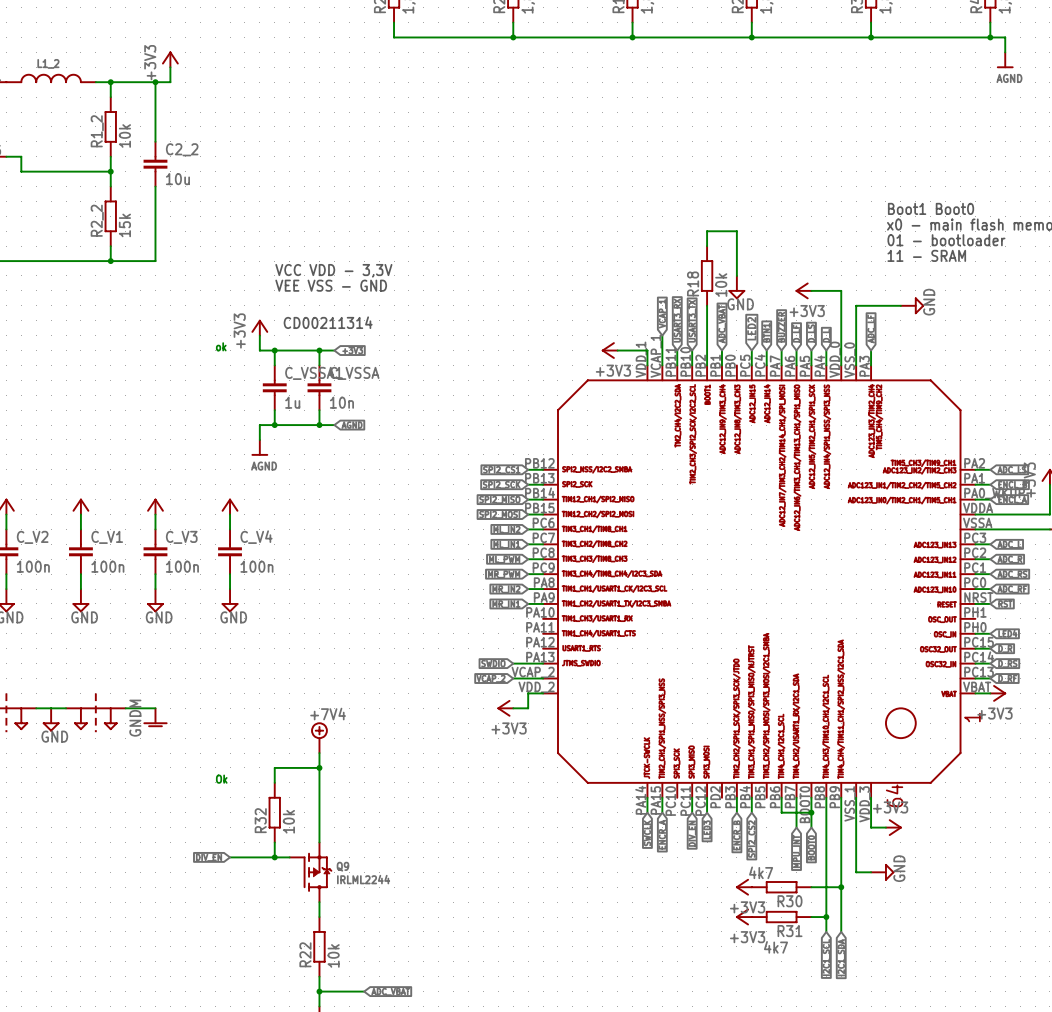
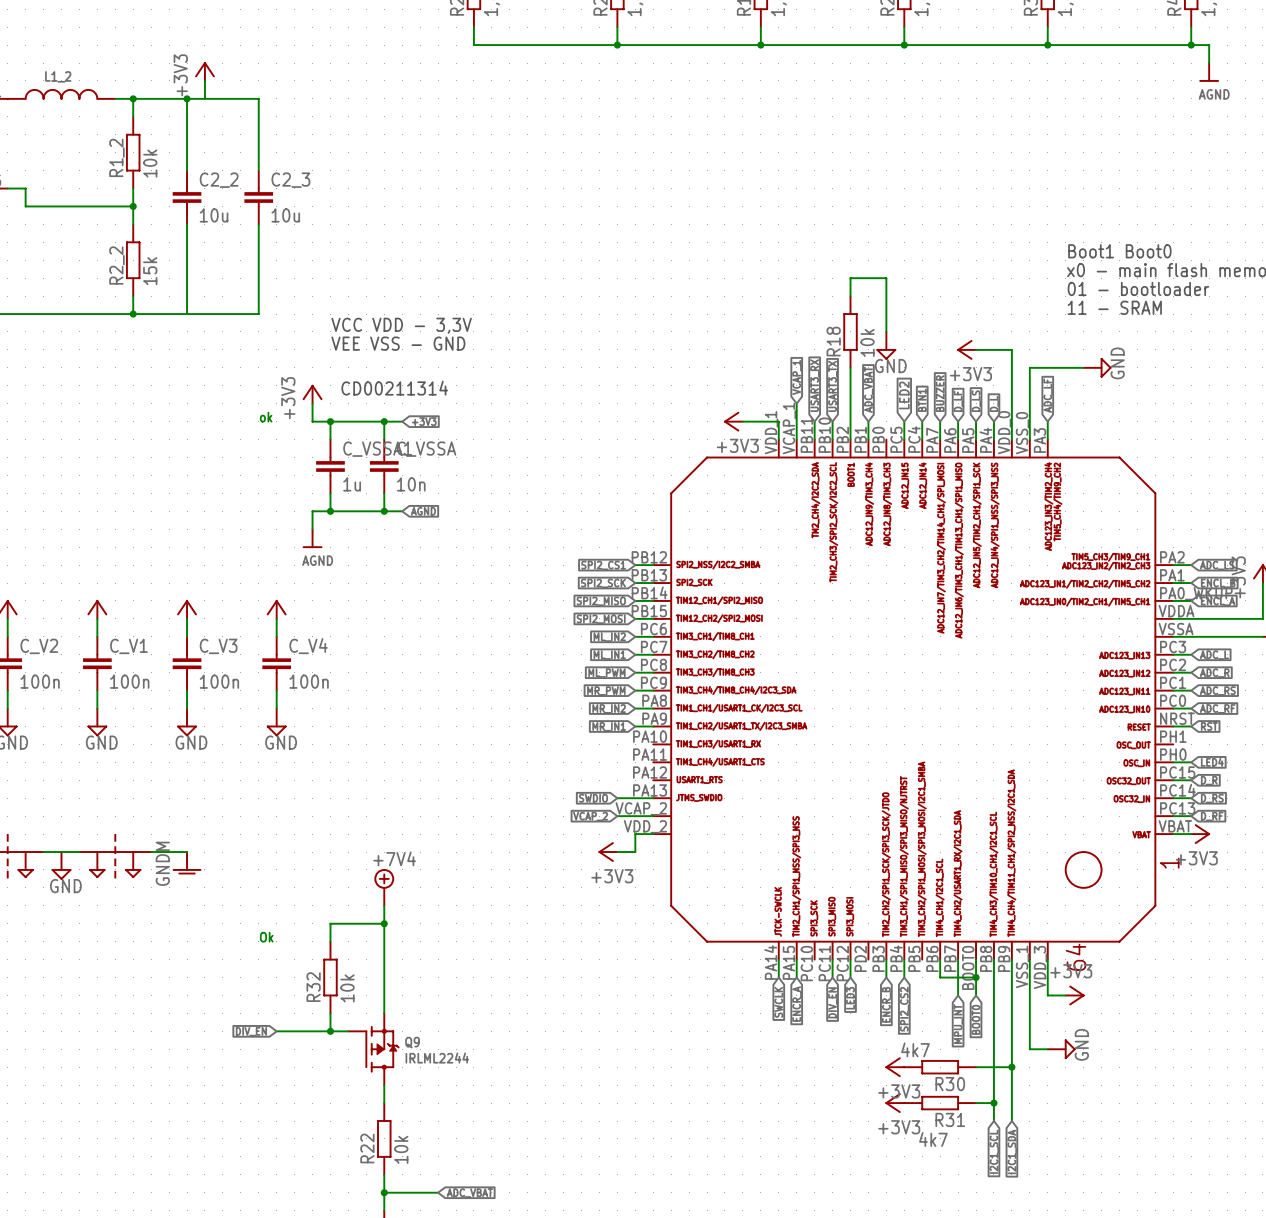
wire: none -> (204, 98) (258, 98) (258, 170)
C2_3: none -> 10u (258, 197)
wire: none -> (258, 224) (258, 314) (187, 314)

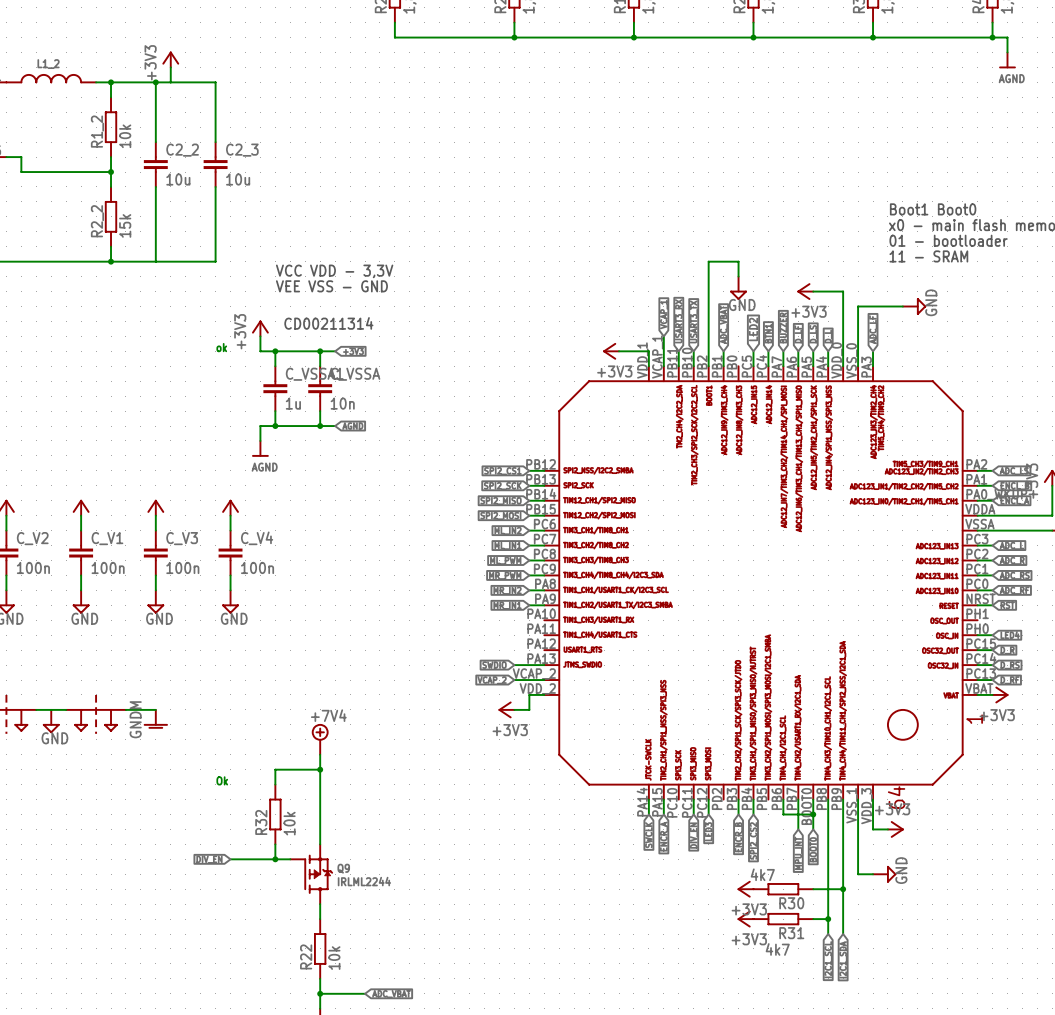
wire: (850, 296) (850, 278) (886, 278) (886, 314) -> (708, 306) (708, 261) (738, 261)
R18: 10k (850, 331) -> none

